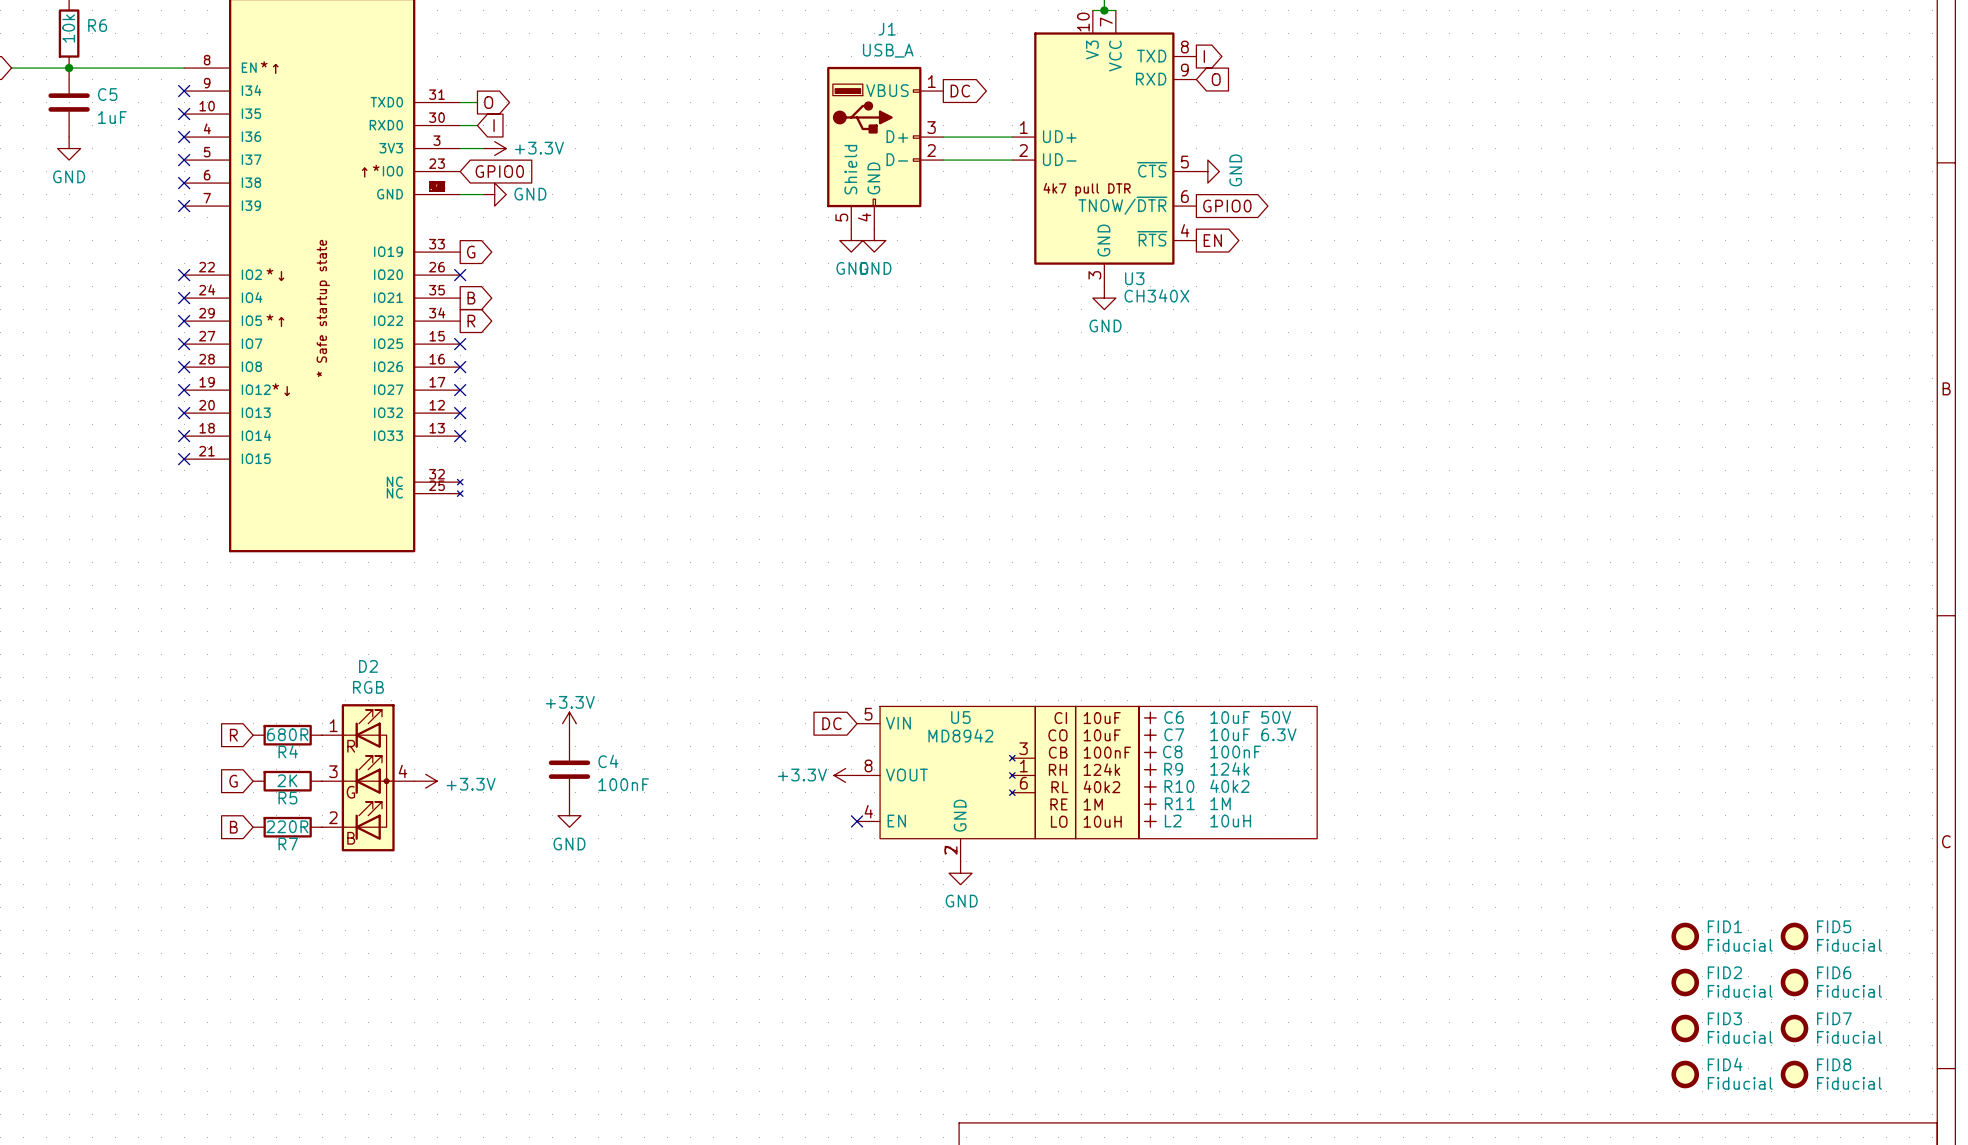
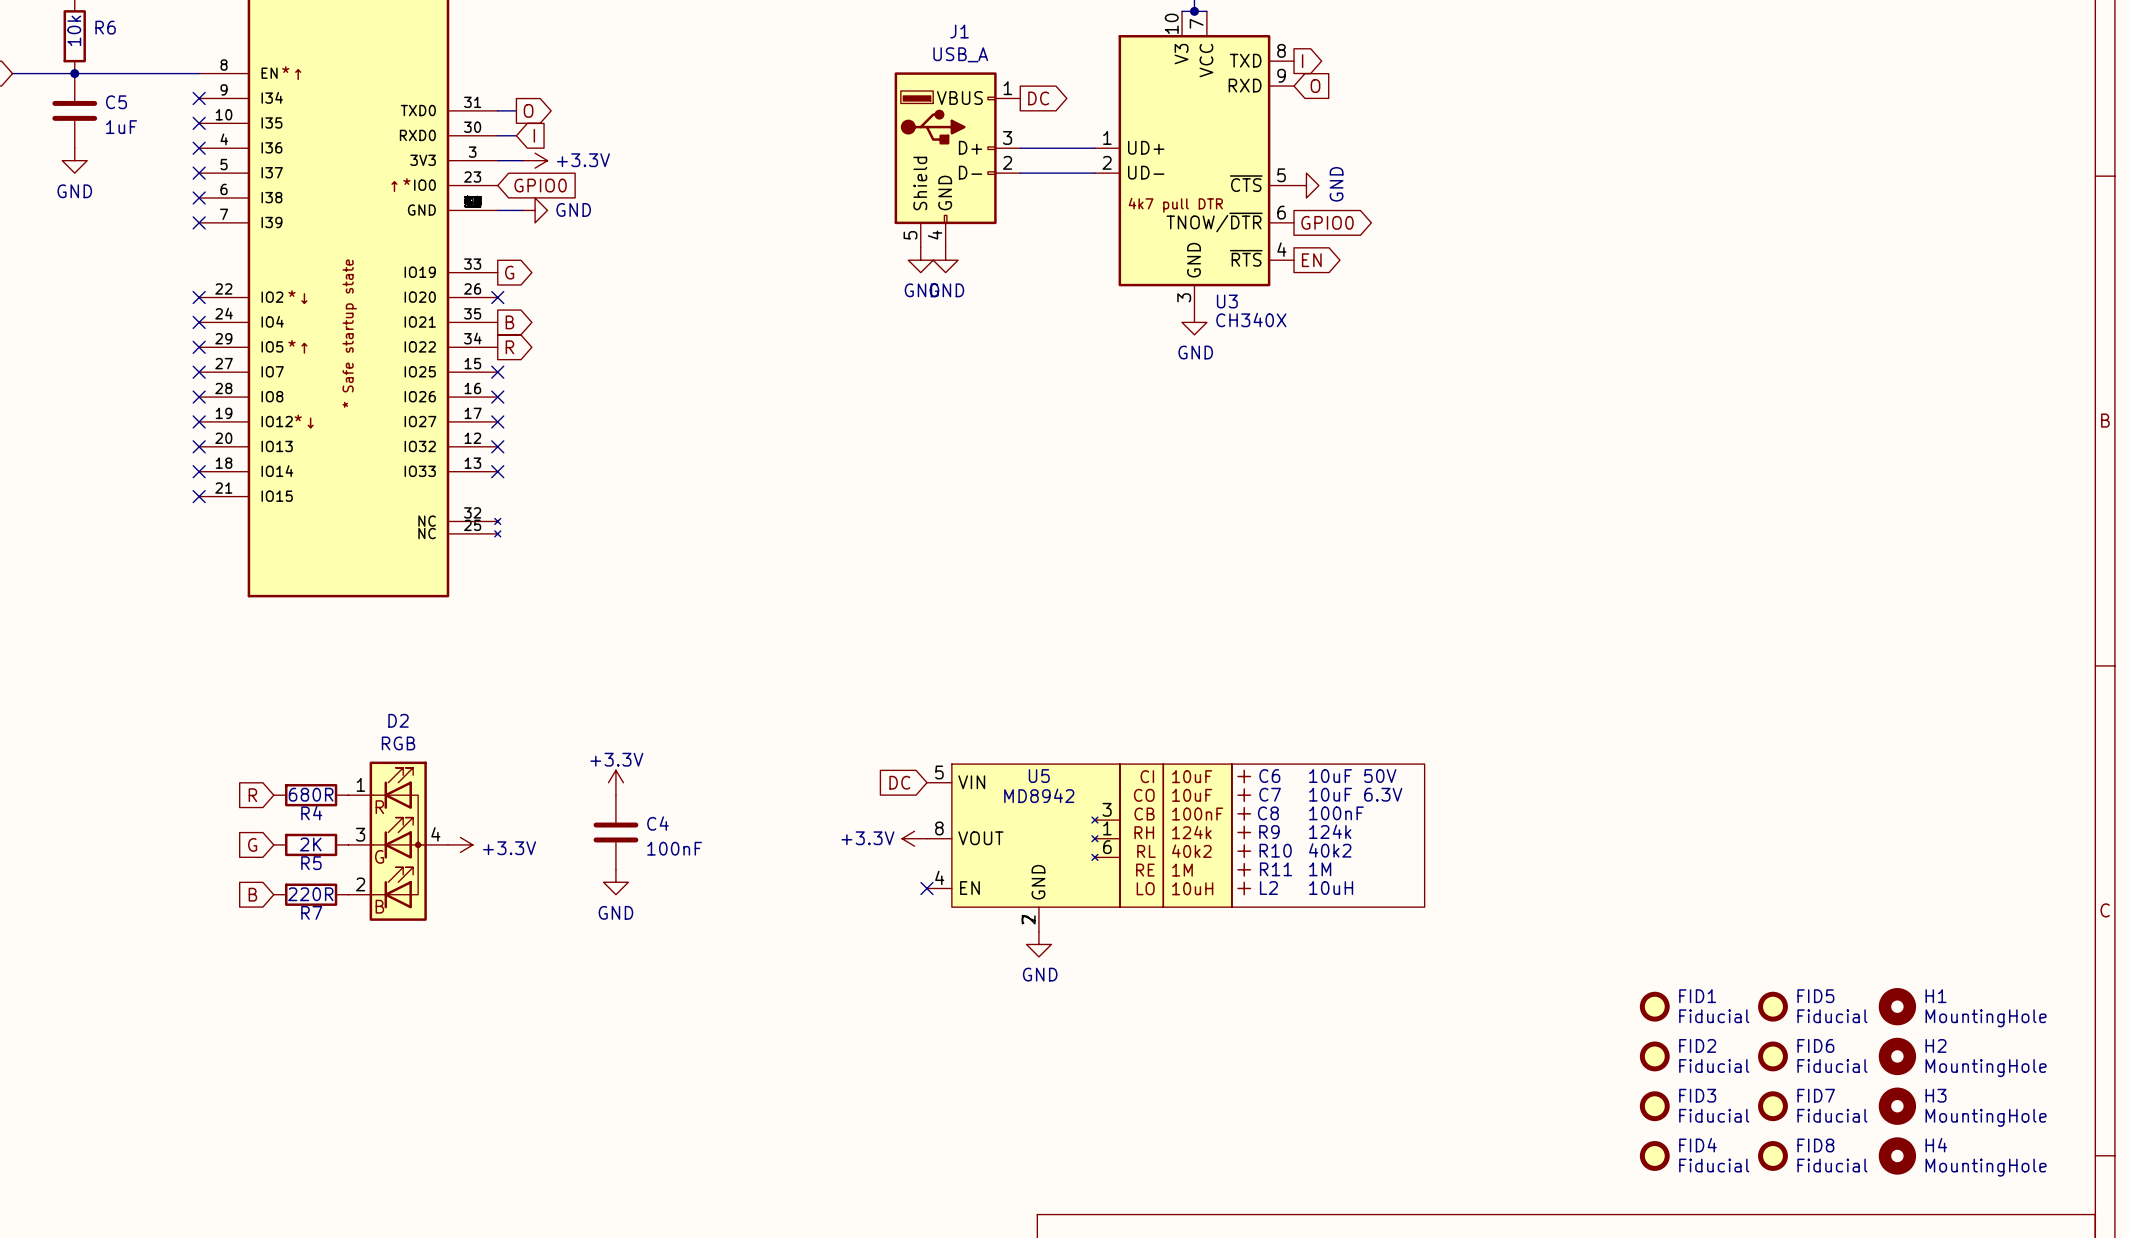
H1: none -> MountingHole (1897, 1006)
FID1 position: (1685, 936) -> (1654, 1006)
FID5 position: (1794, 936) -> (1772, 1006)
H2: none -> MountingHole (1897, 1056)
FID2 position: (1685, 982) -> (1654, 1056)
FID6 position: (1794, 982) -> (1772, 1056)
H3: none -> MountingHole (1897, 1106)
FID3 position: (1685, 1028) -> (1654, 1106)
FID7 position: (1794, 1028) -> (1772, 1106)
H4: none -> MountingHole (1897, 1155)
FID4 position: (1685, 1074) -> (1654, 1155)
FID8 position: (1794, 1074) -> (1772, 1155)

